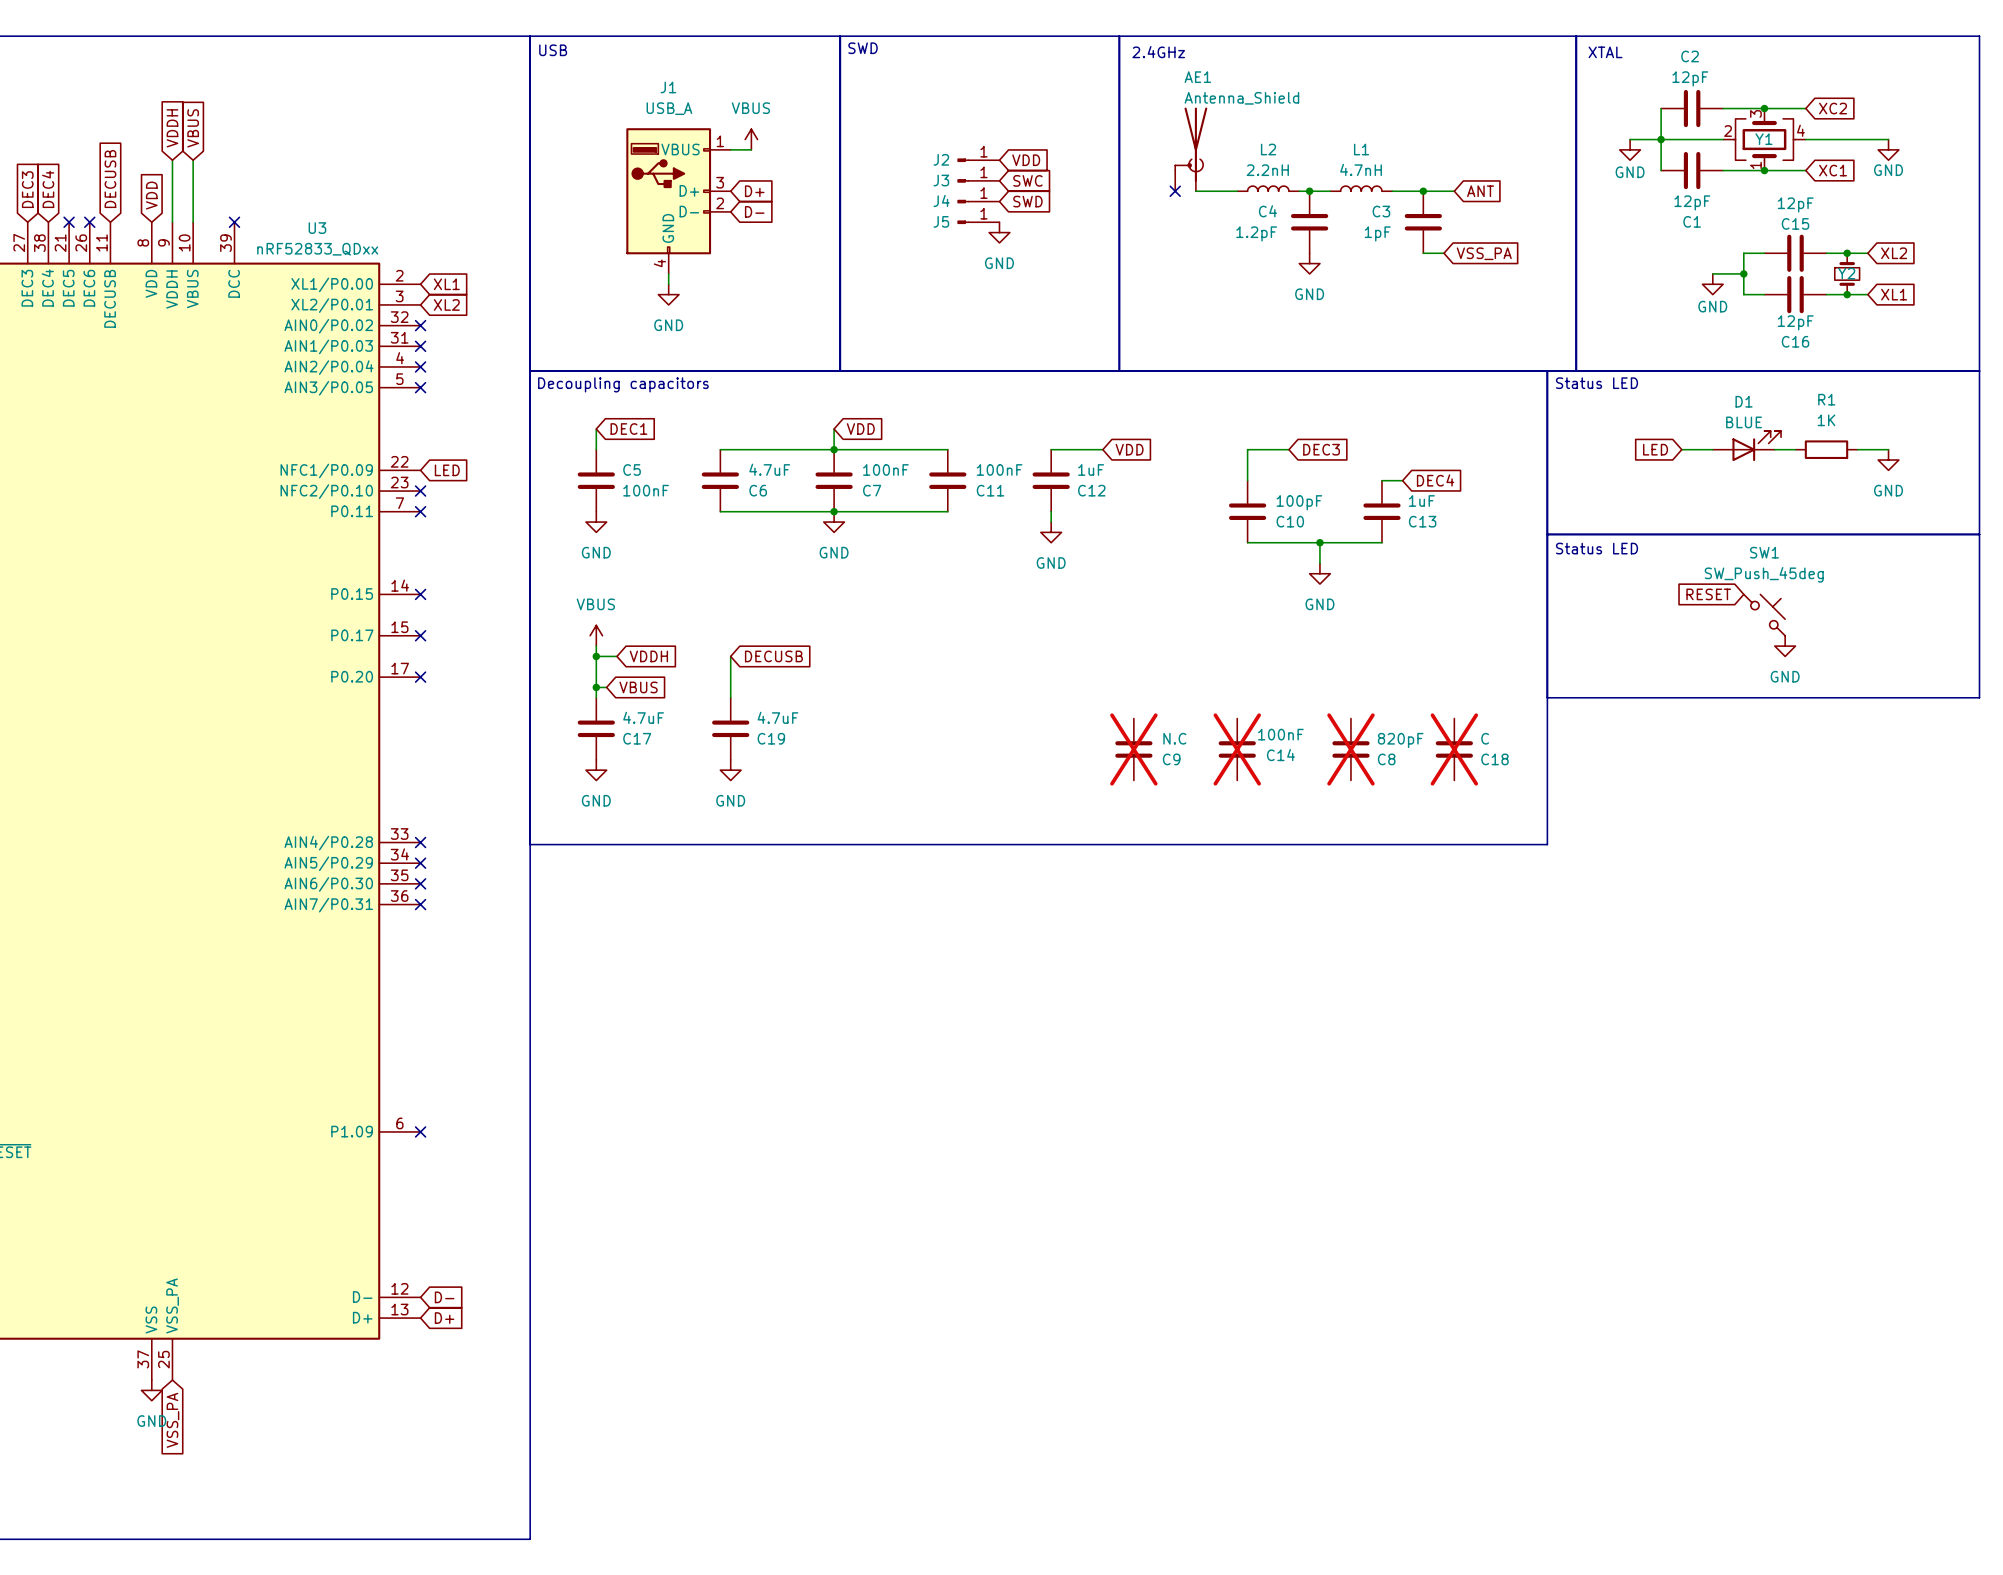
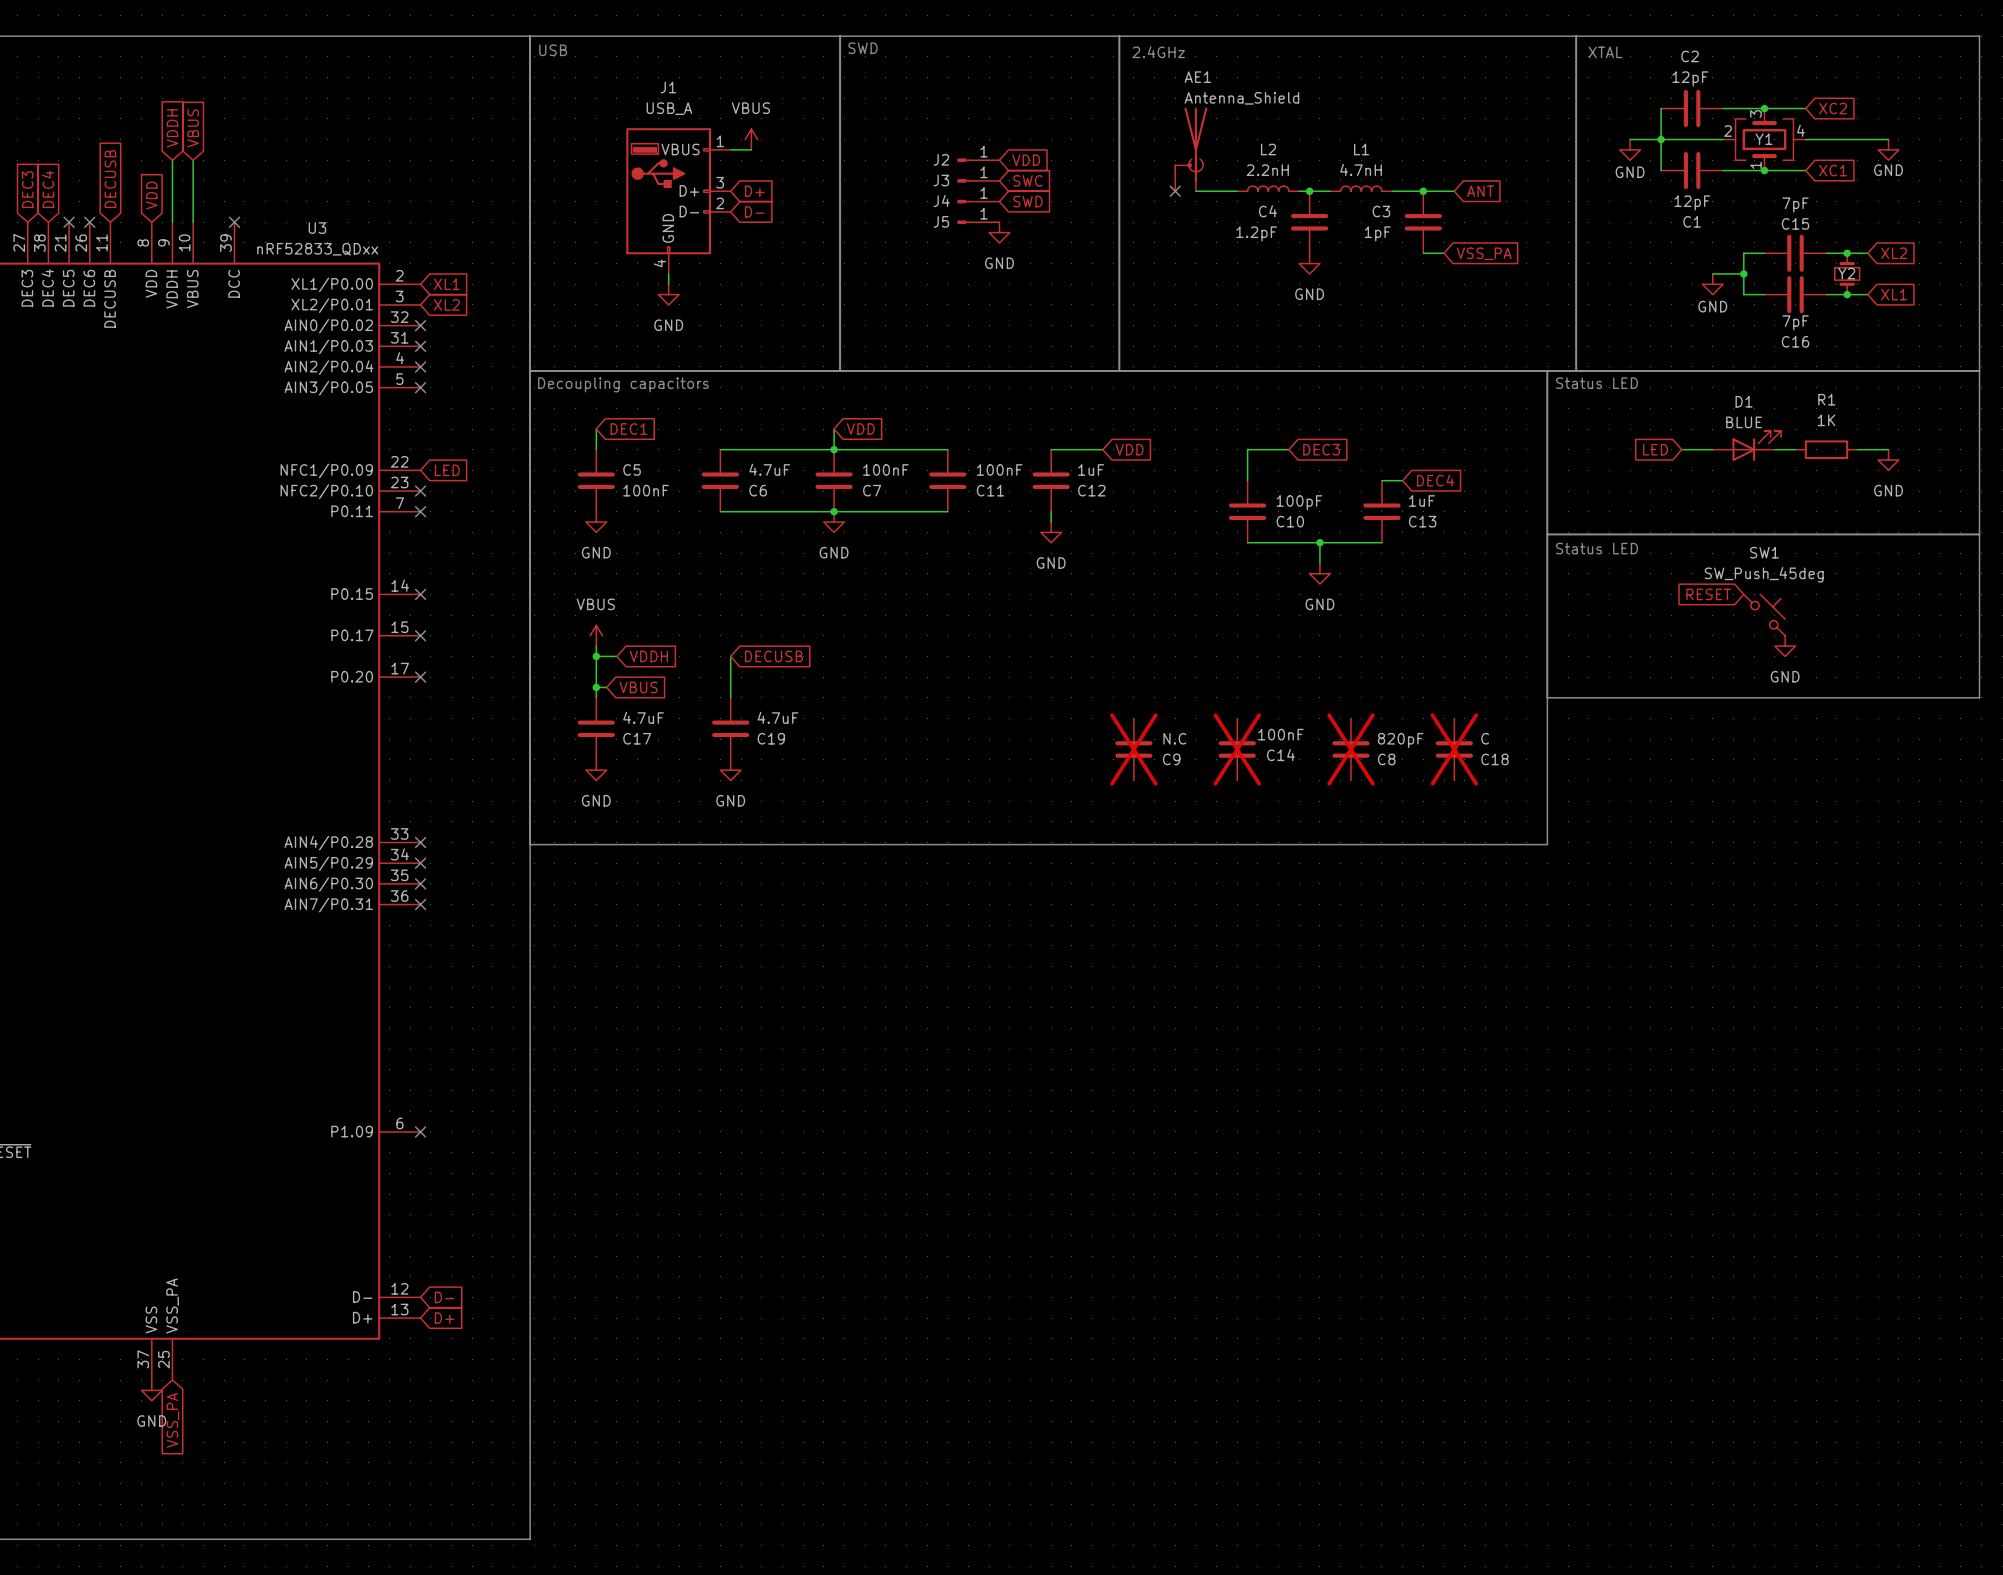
C15 value: 12pF (1795, 204) -> 7pF (1795, 204)
C16 value: 12pF (1795, 322) -> 7pF (1795, 322)

